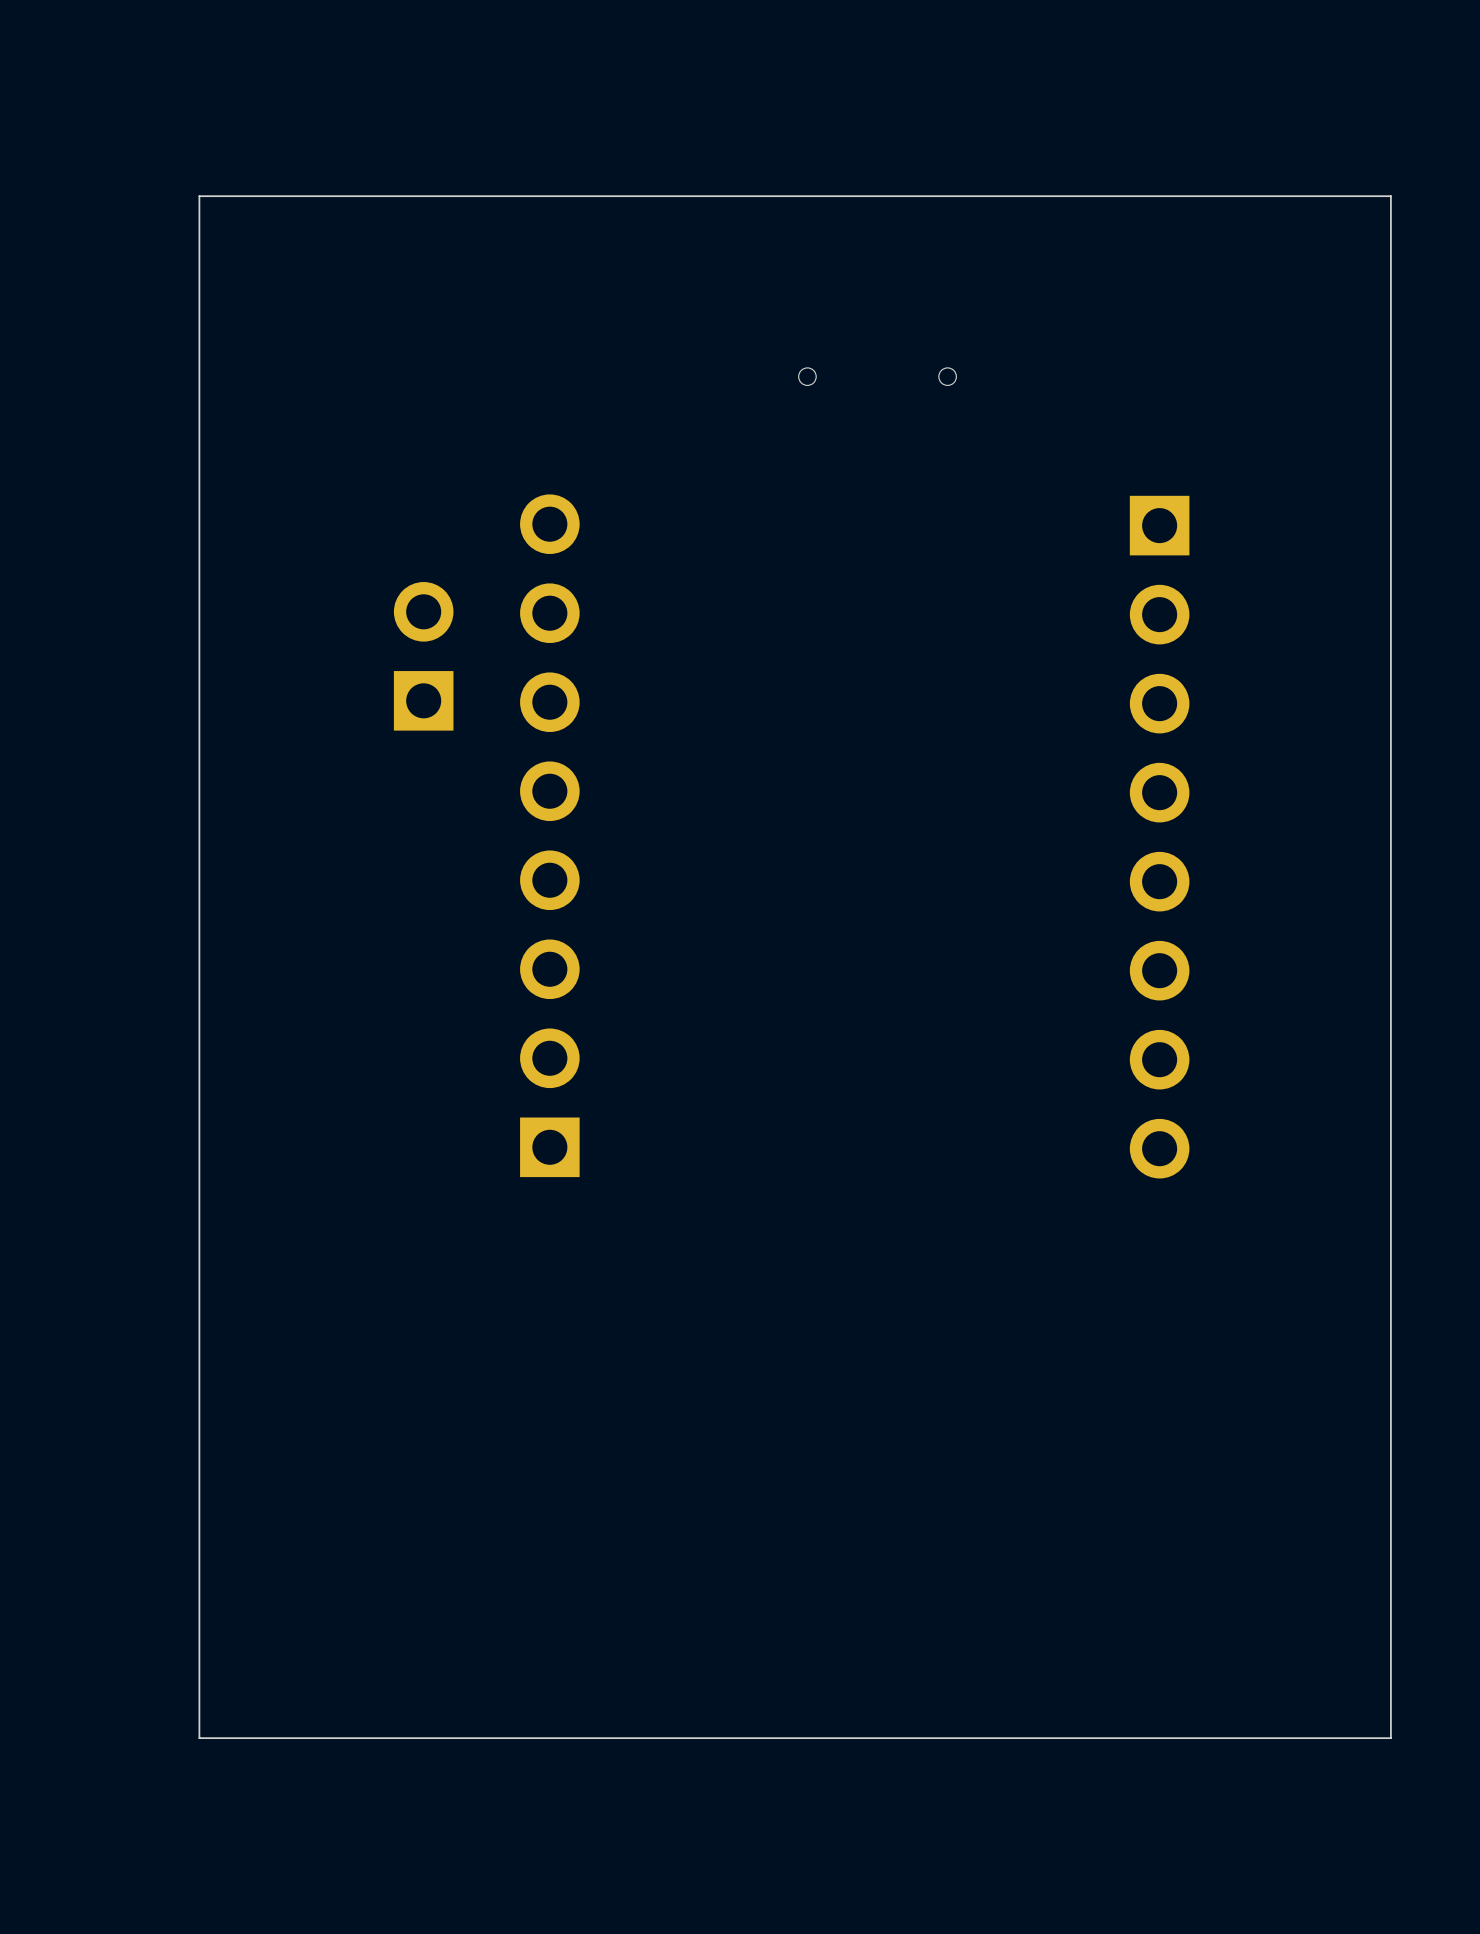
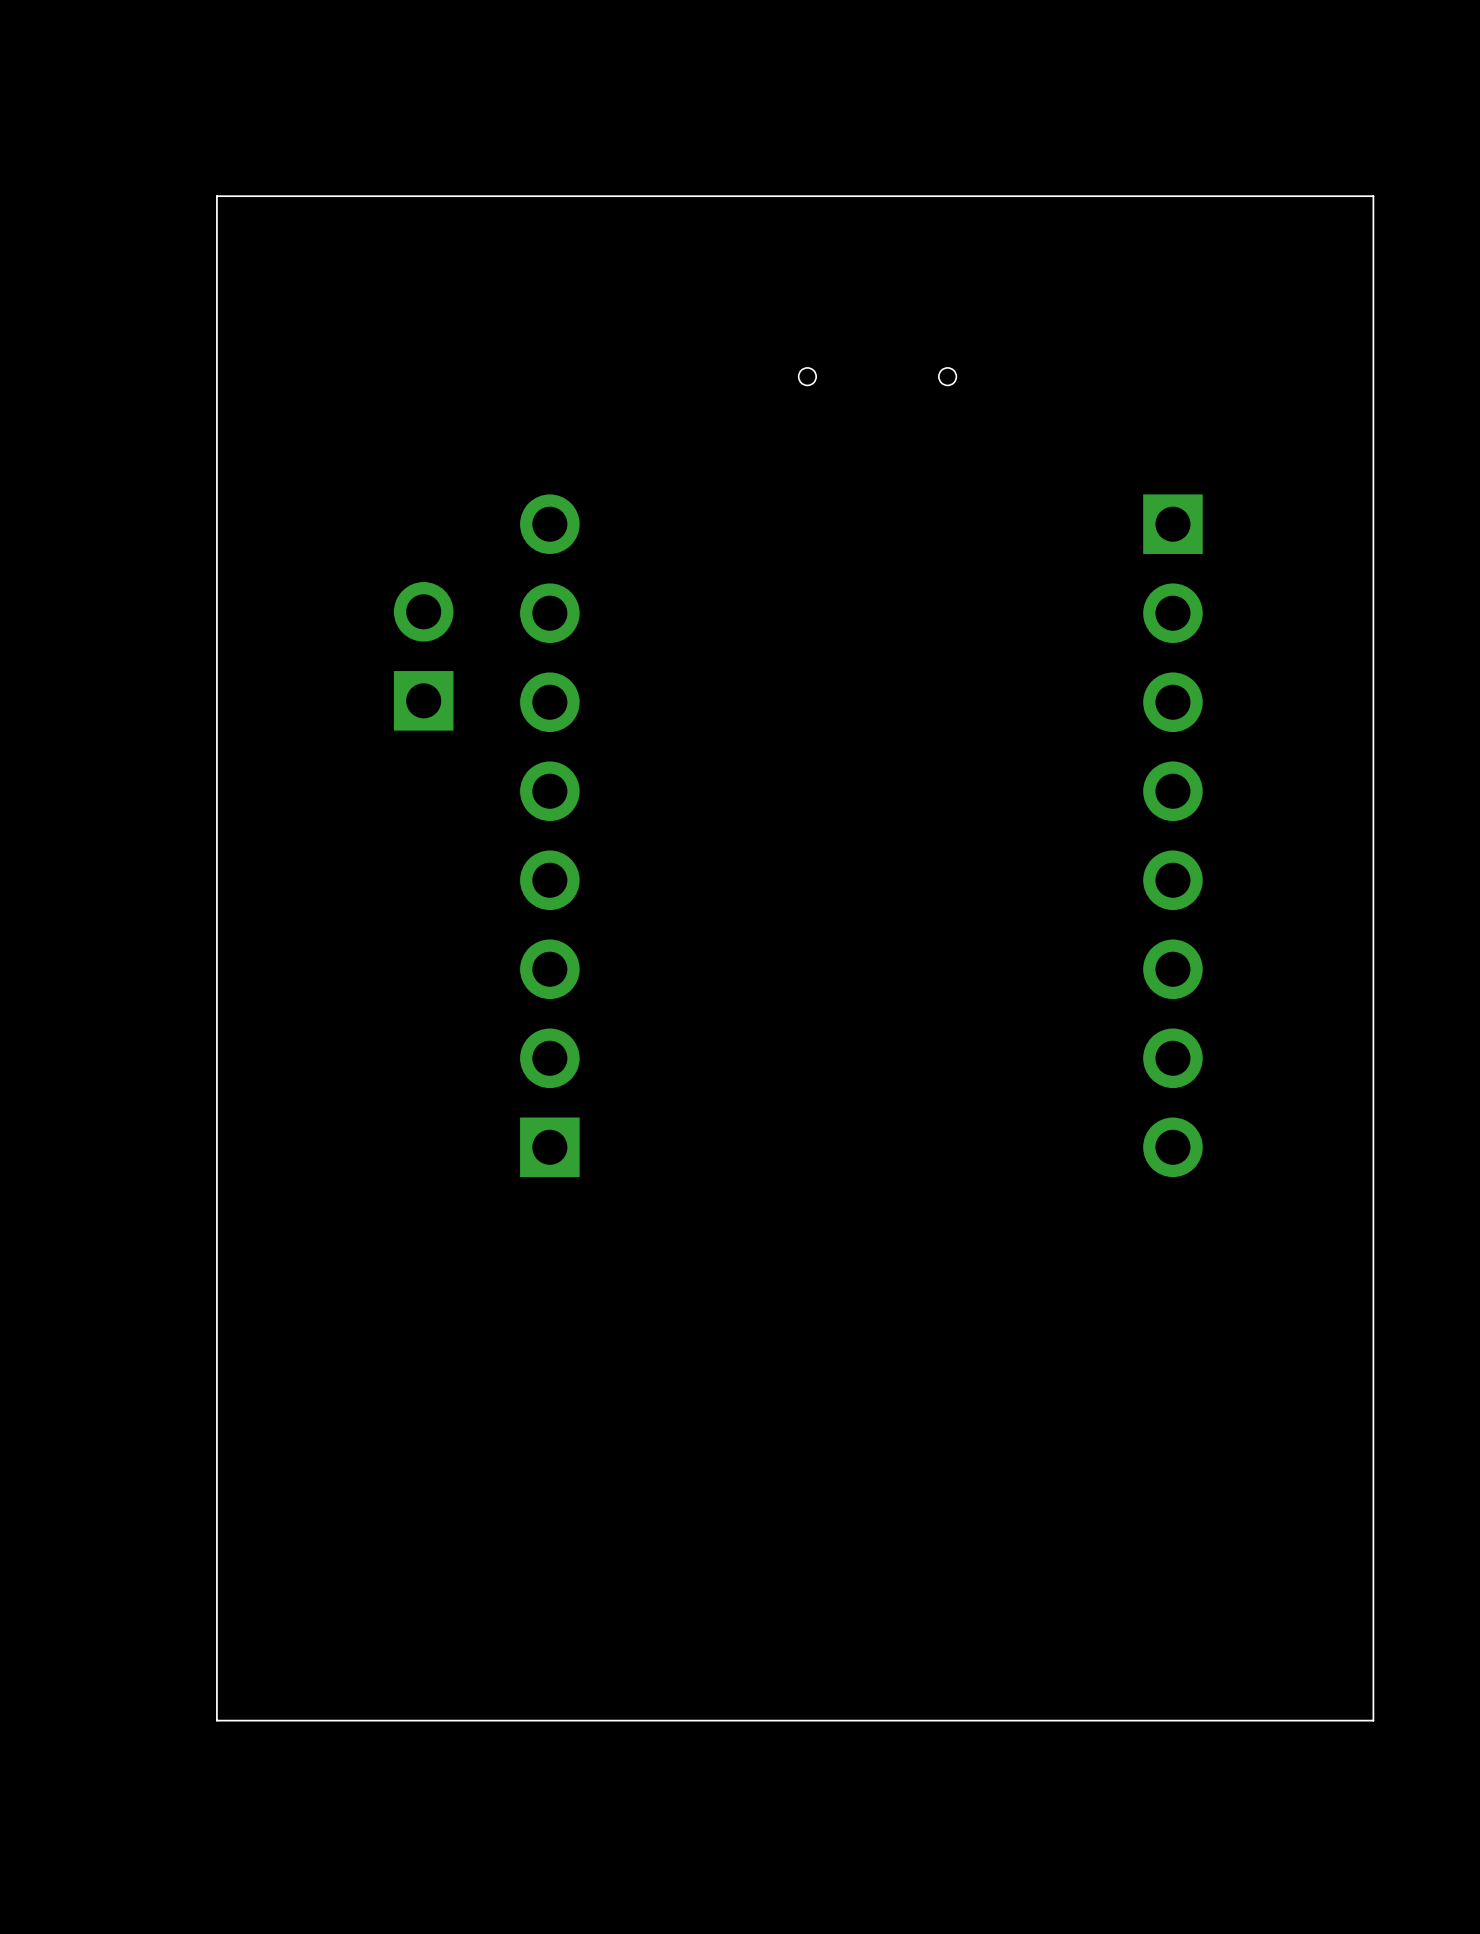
board edge: (1373, 196) (1390, 196) (1390, 1738) (199, 1738) (199, 196) (216, 196) -> (1373, 196) (1373, 1720) (216, 1720) (216, 196)
part position: (1159, 837) -> (1172, 835)

